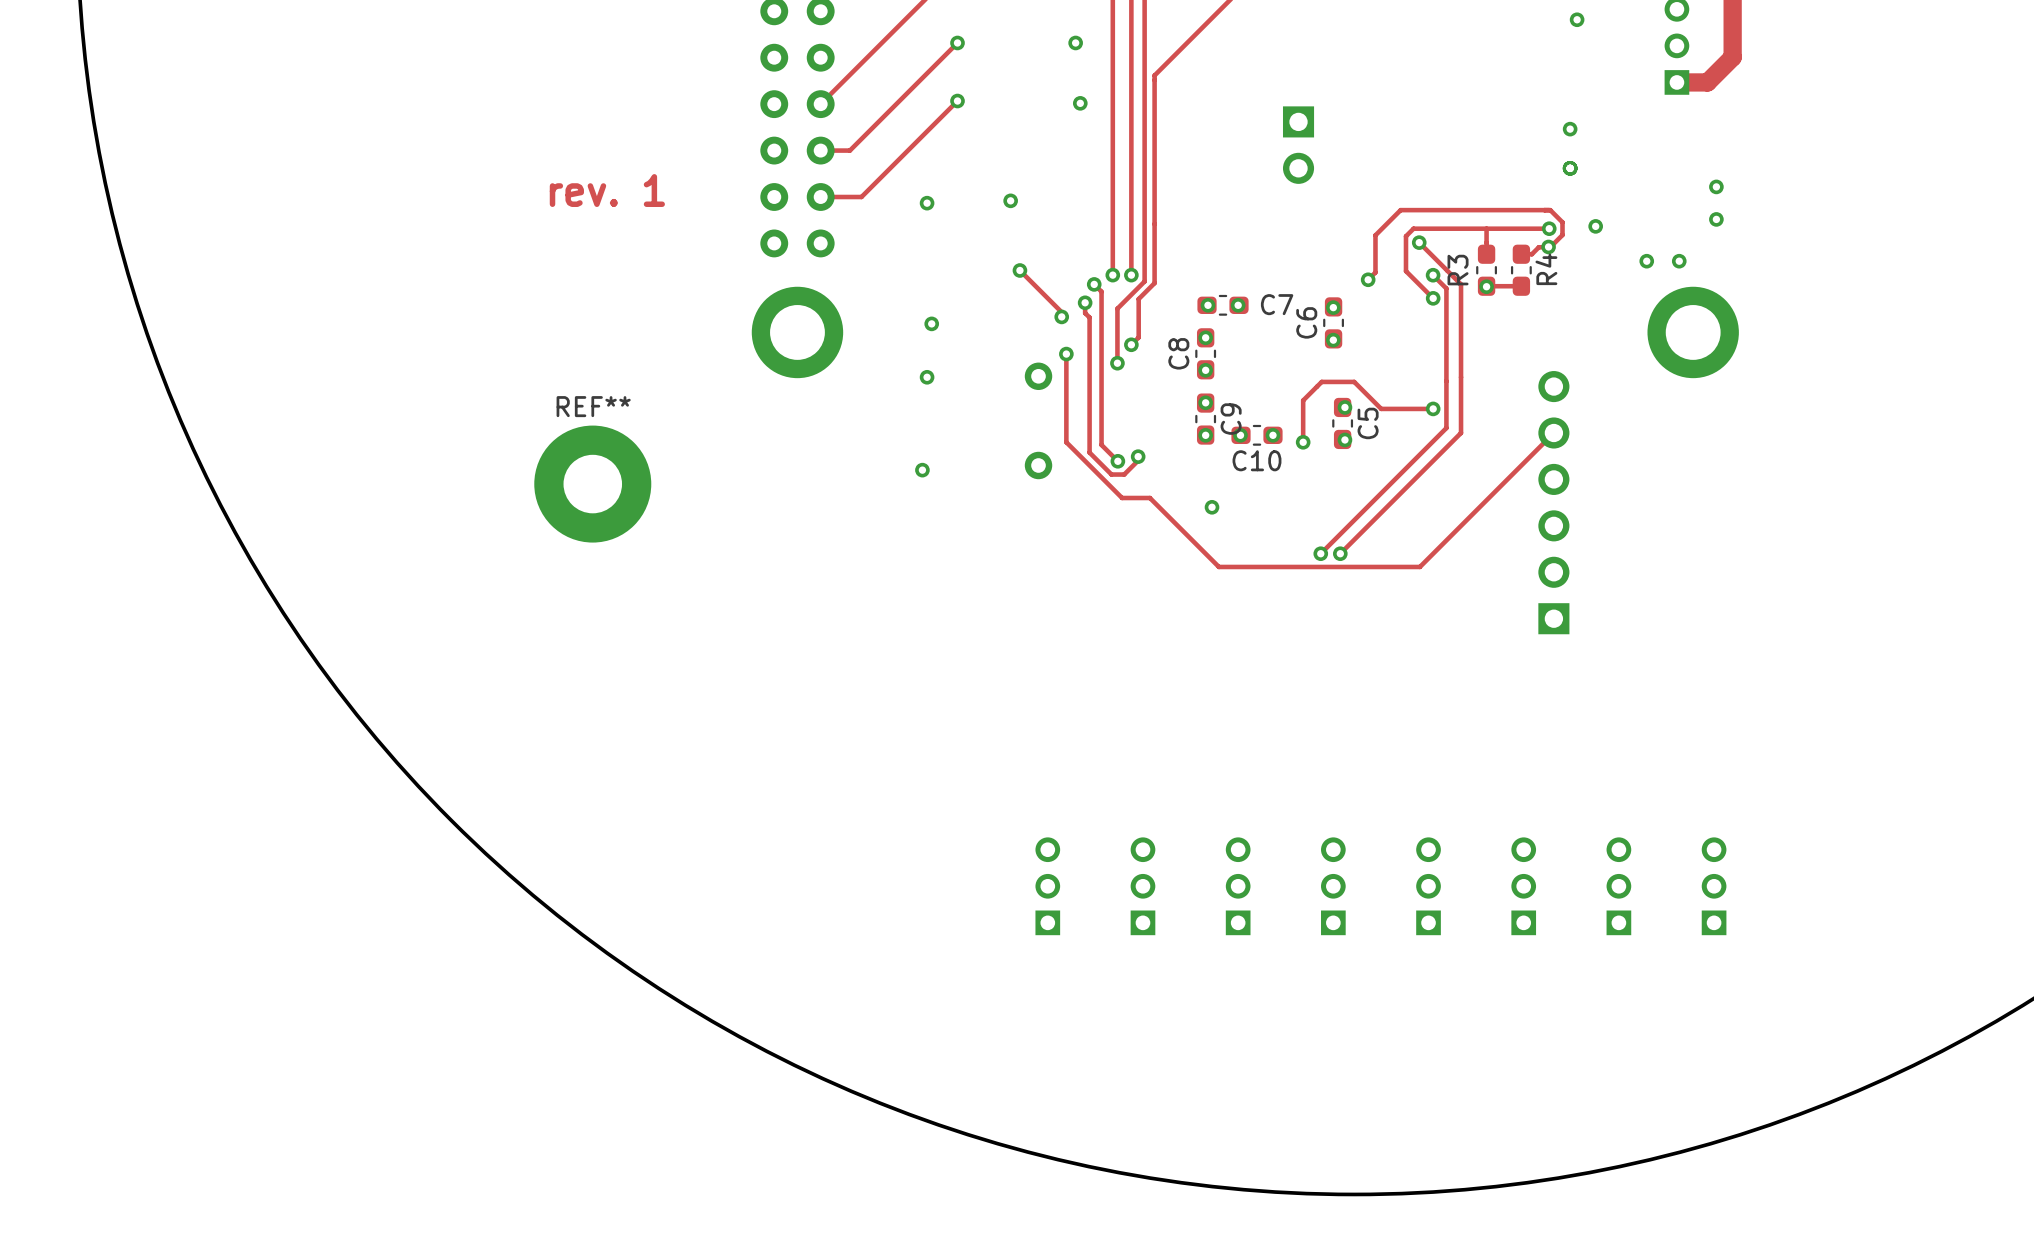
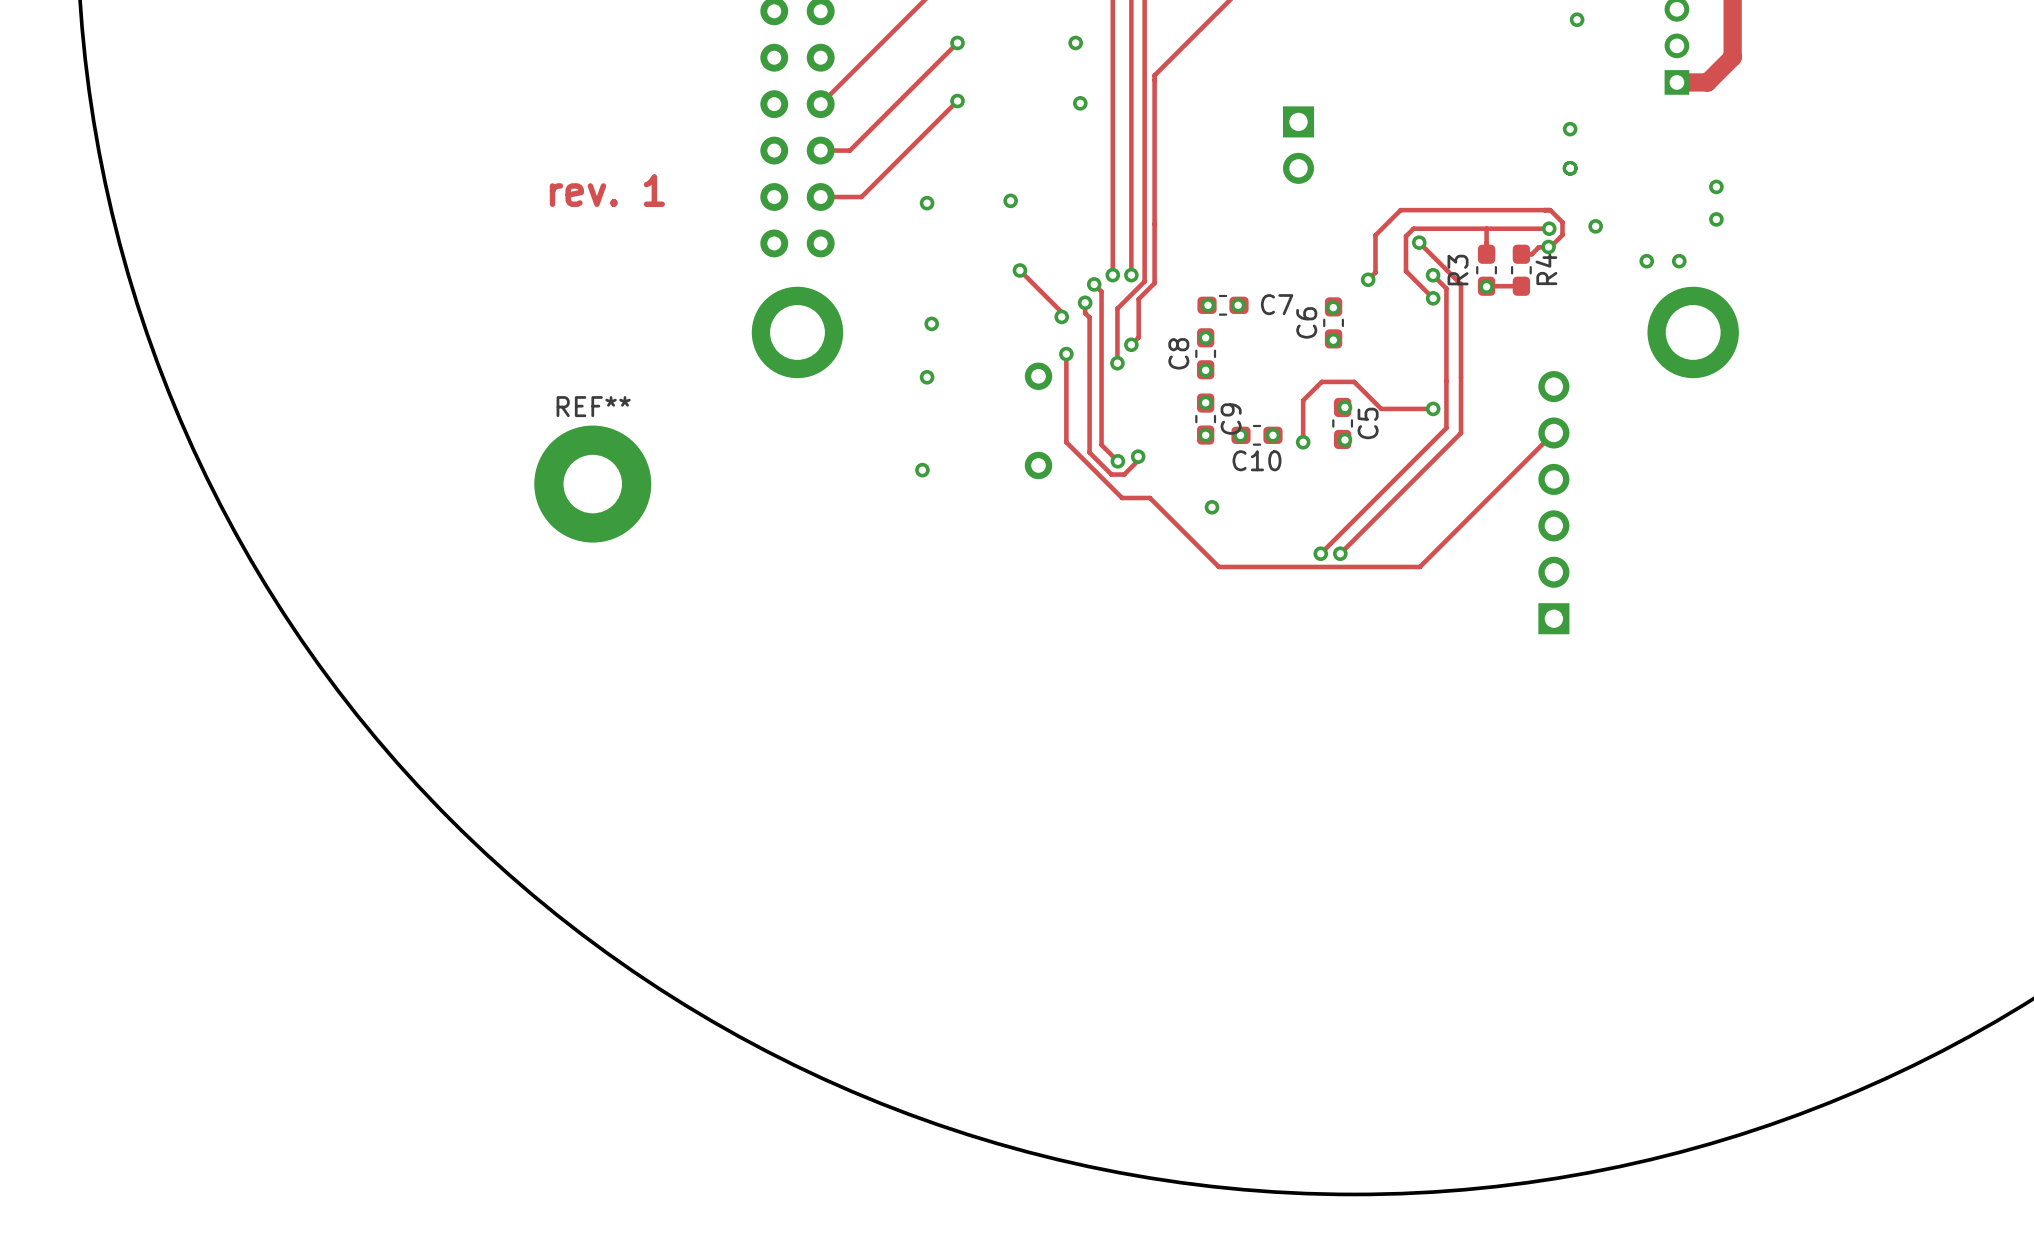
part: (1047, 886) -> none
part: (1142, 886) -> none
part: (1238, 886) -> none
part: (1333, 886) -> none
part: (1428, 886) -> none
part: (1523, 886) -> none
part: (1618, 886) -> none
part: (1714, 886) -> none

